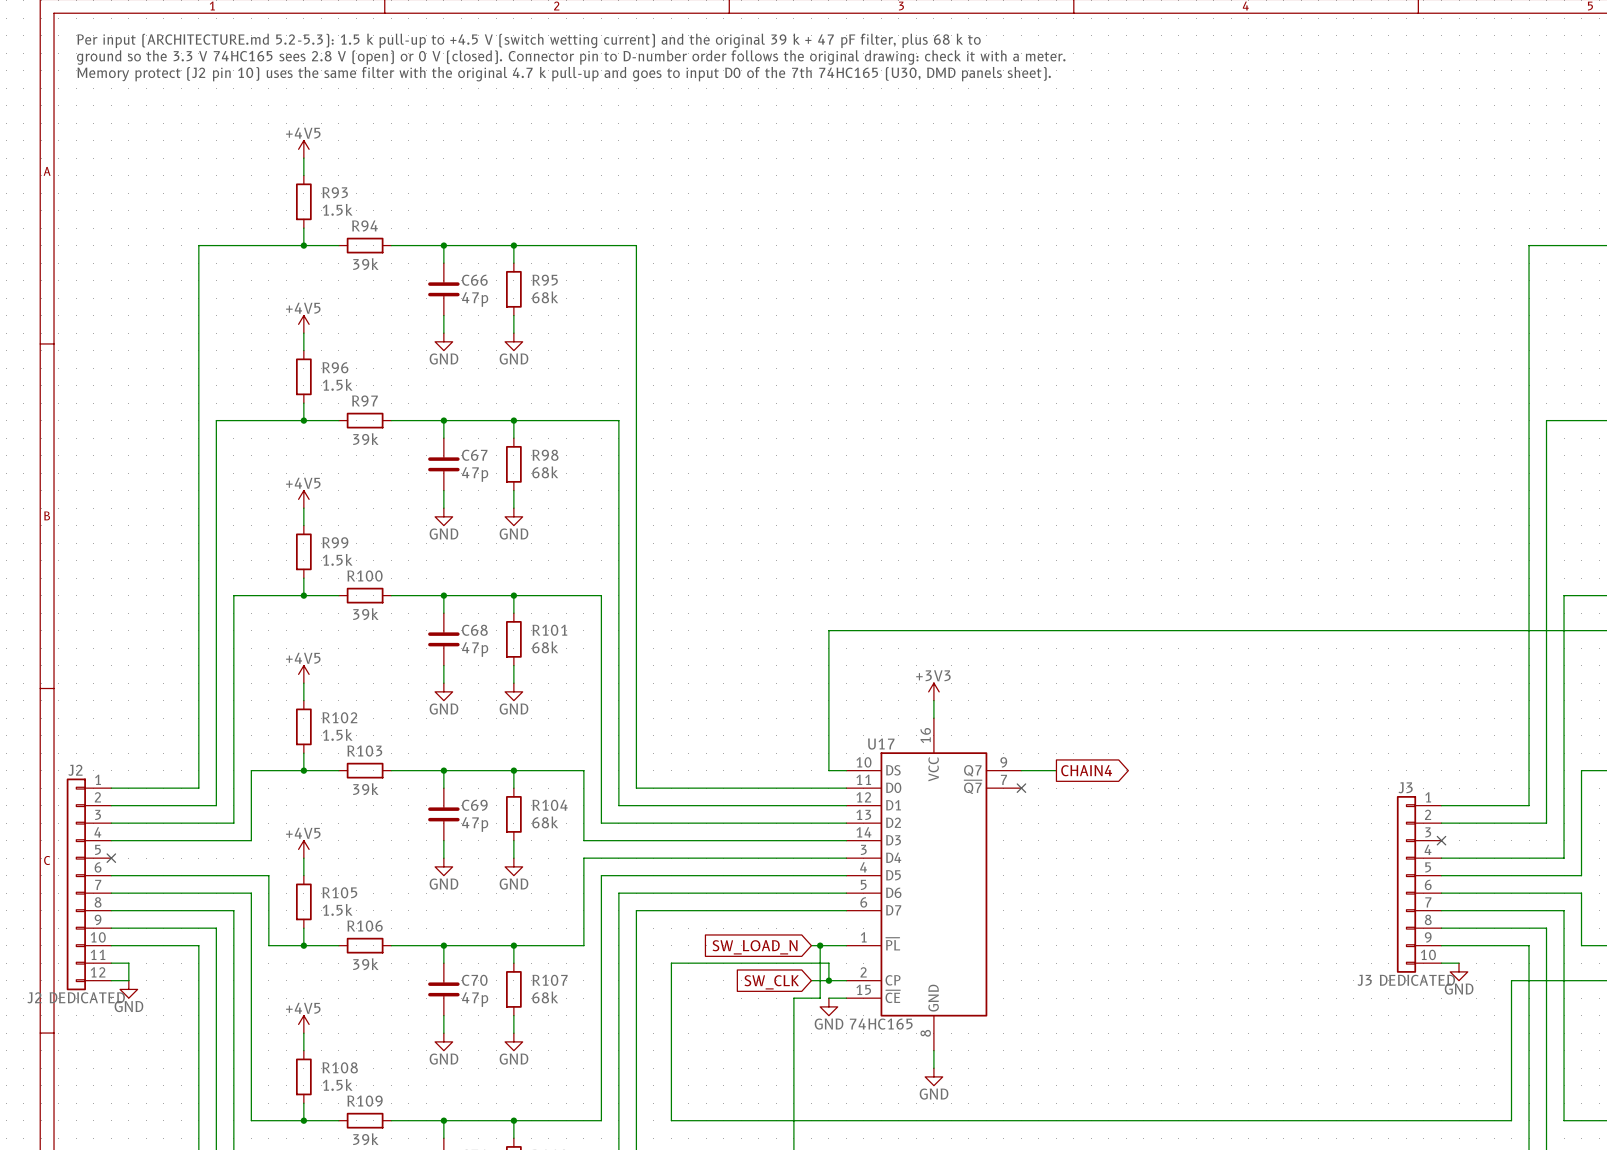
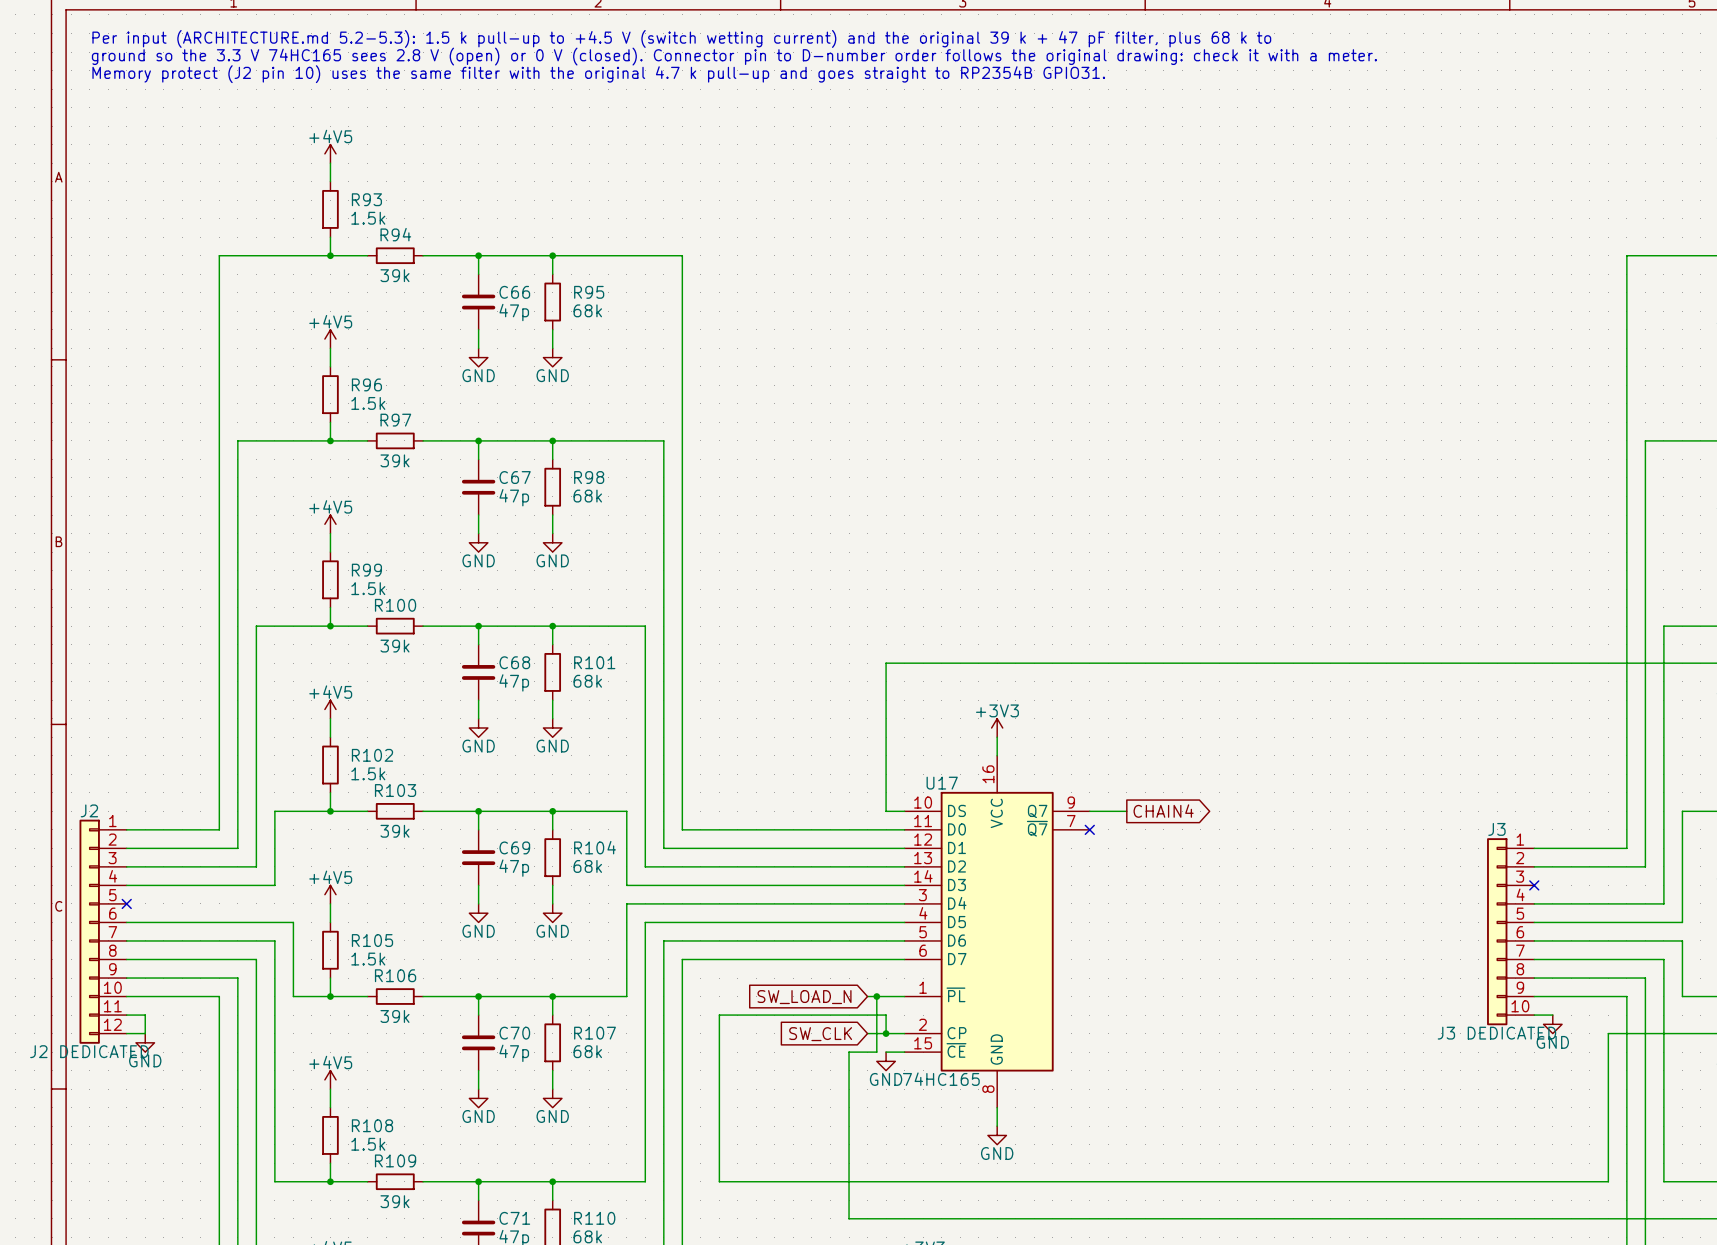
text: Memory protect (J2 pin 10) uses the same filter with the original 4.7 k pull-up and goes to input D0 of the 7th 74HC165 (U30, DMD panels sheet). (564, 74) -> Memory protect (J2 pin 10) uses the same filter with the original 4.7 k pull-up and goes straight to RP2354B GPIO31. (598, 74)

